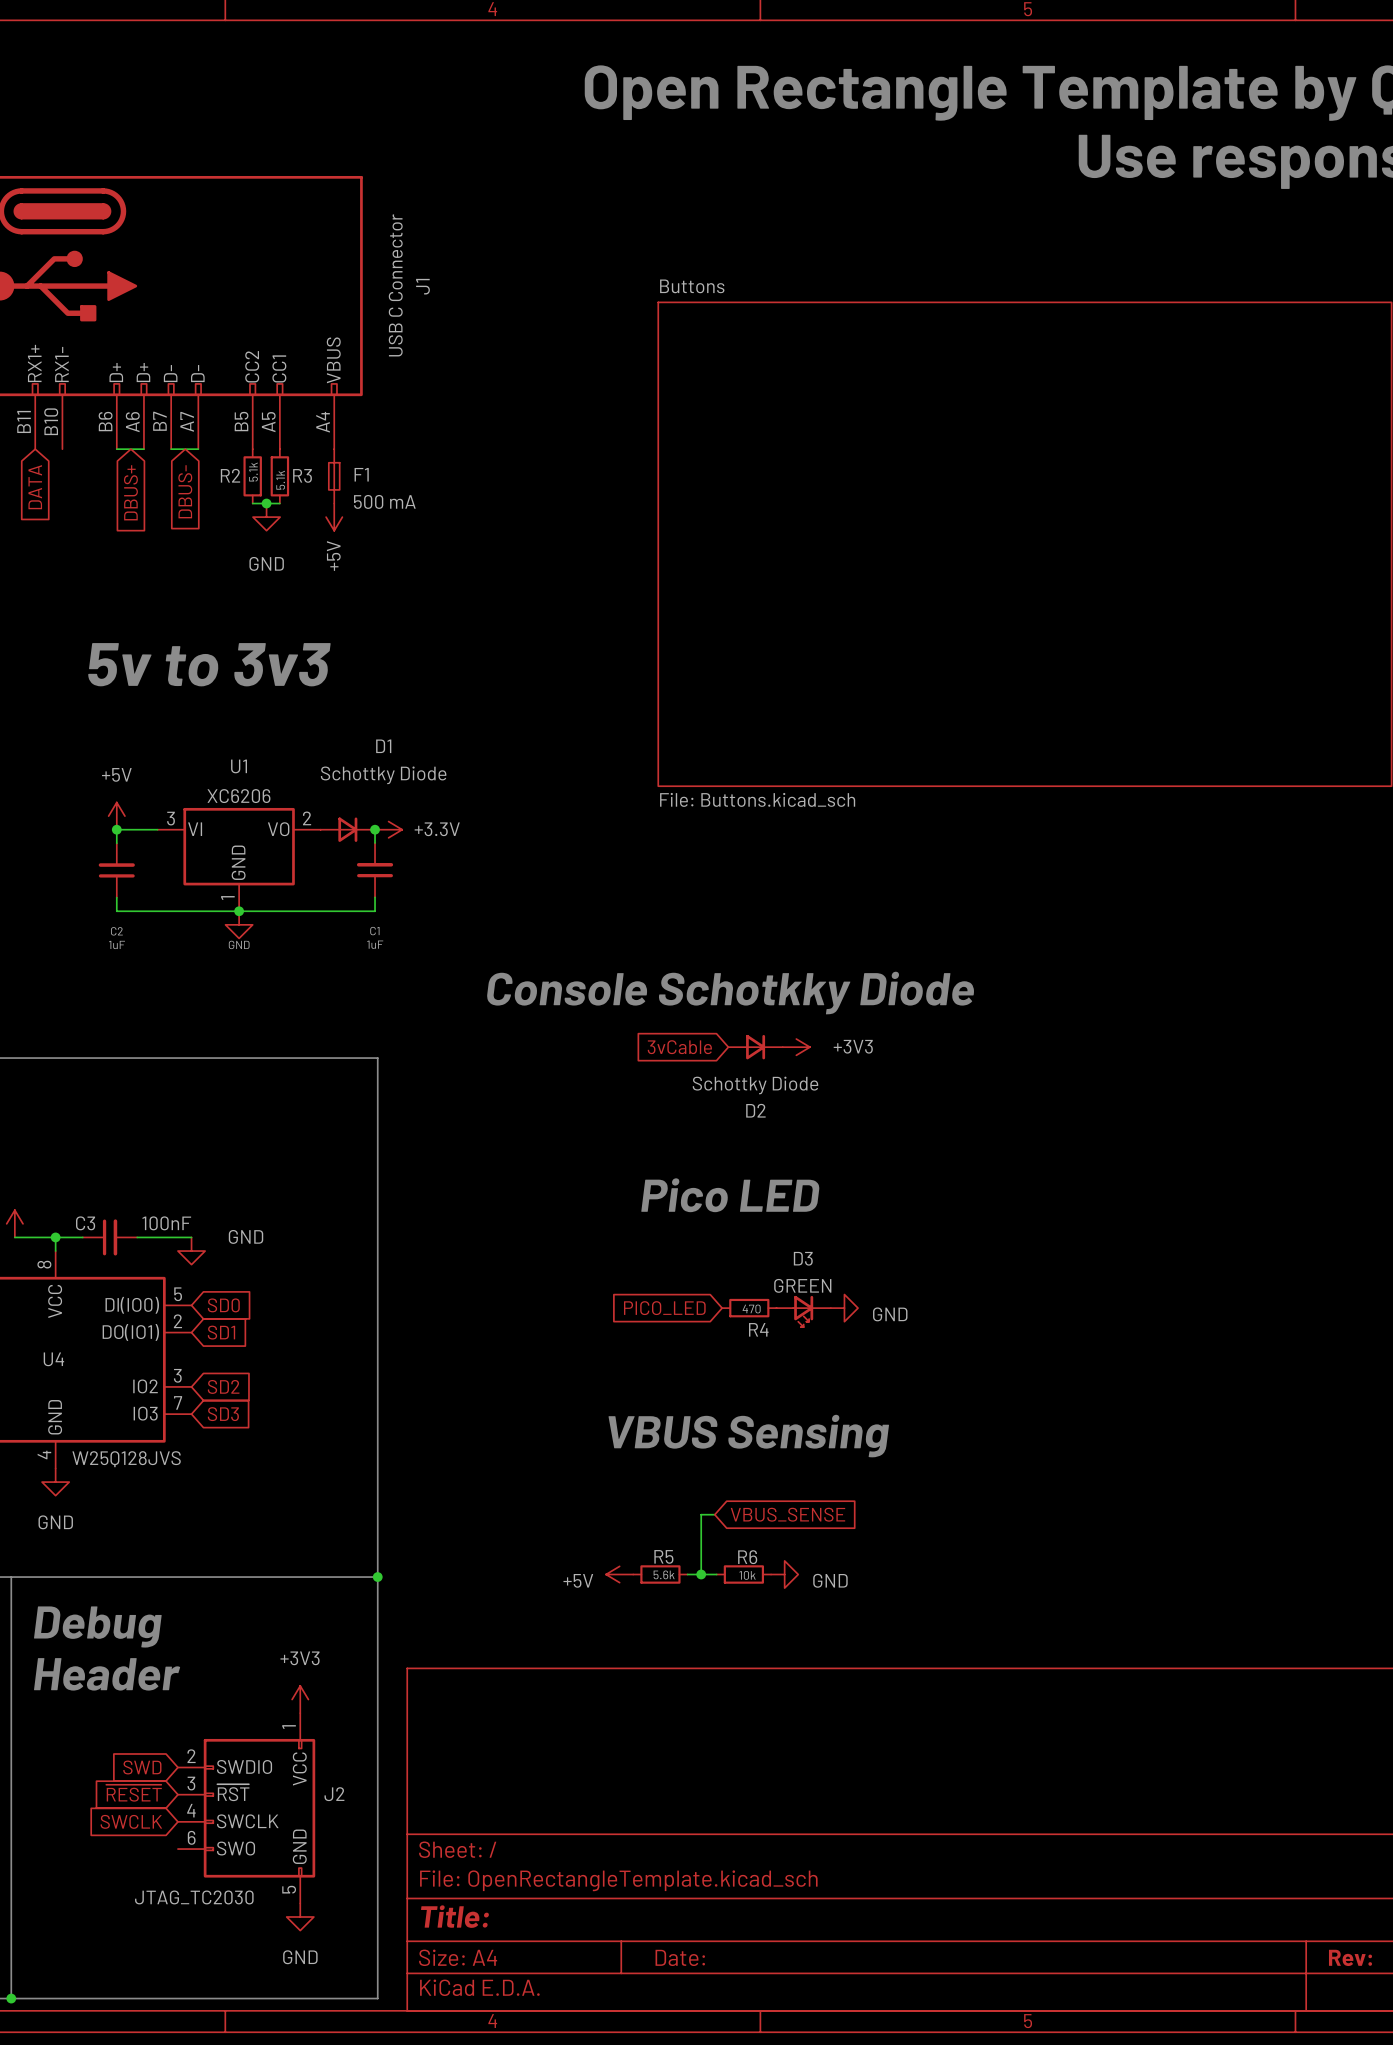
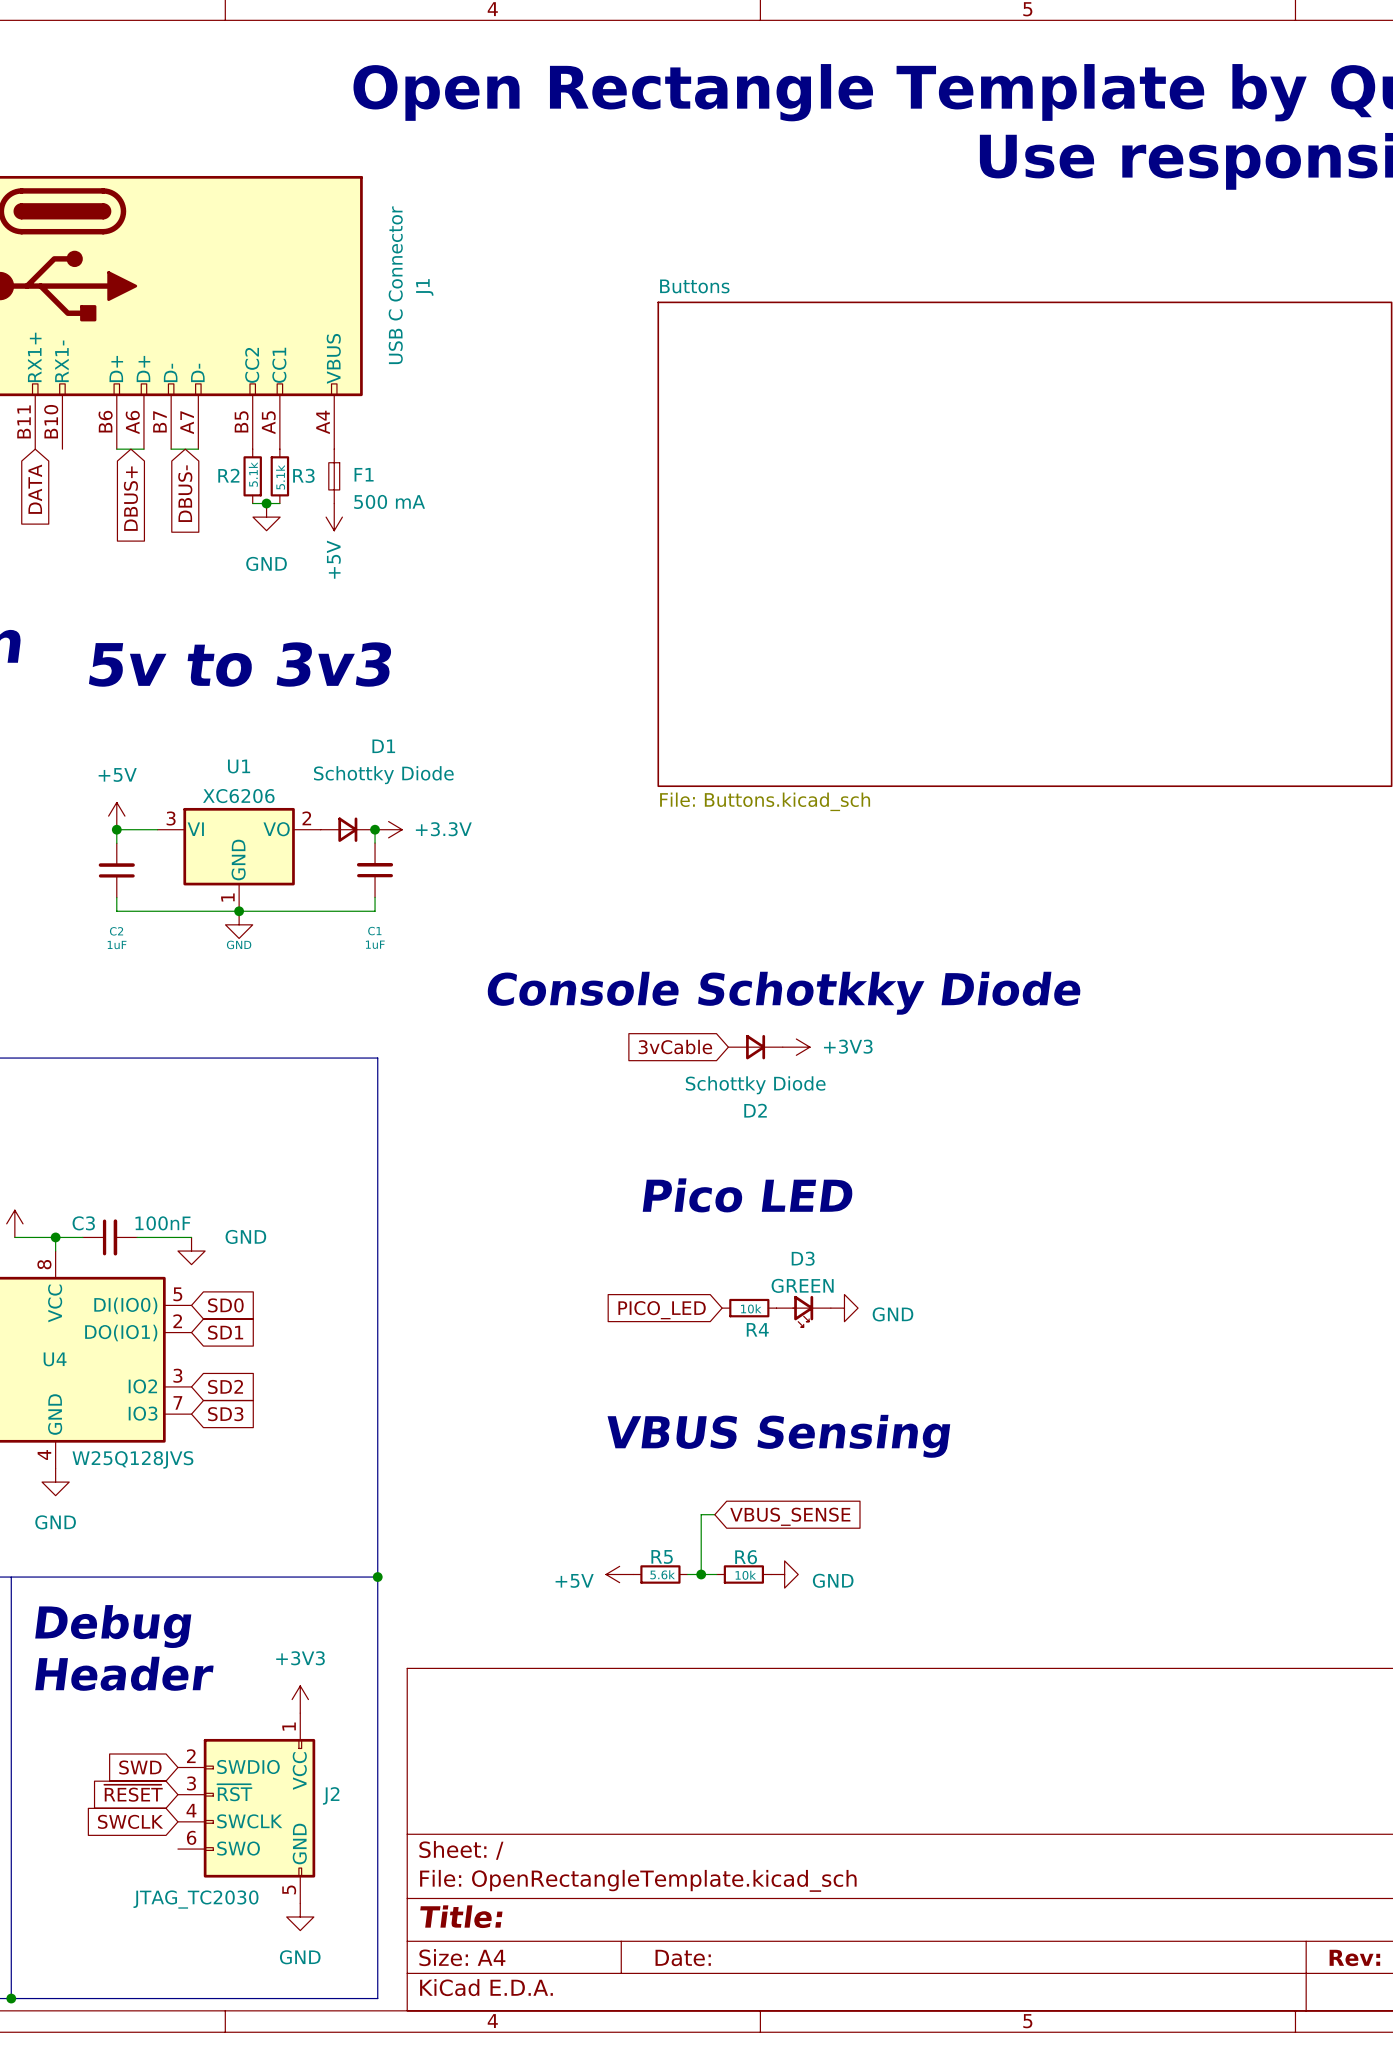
R4 value: 470 (751, 1308) -> 10k (751, 1308)

